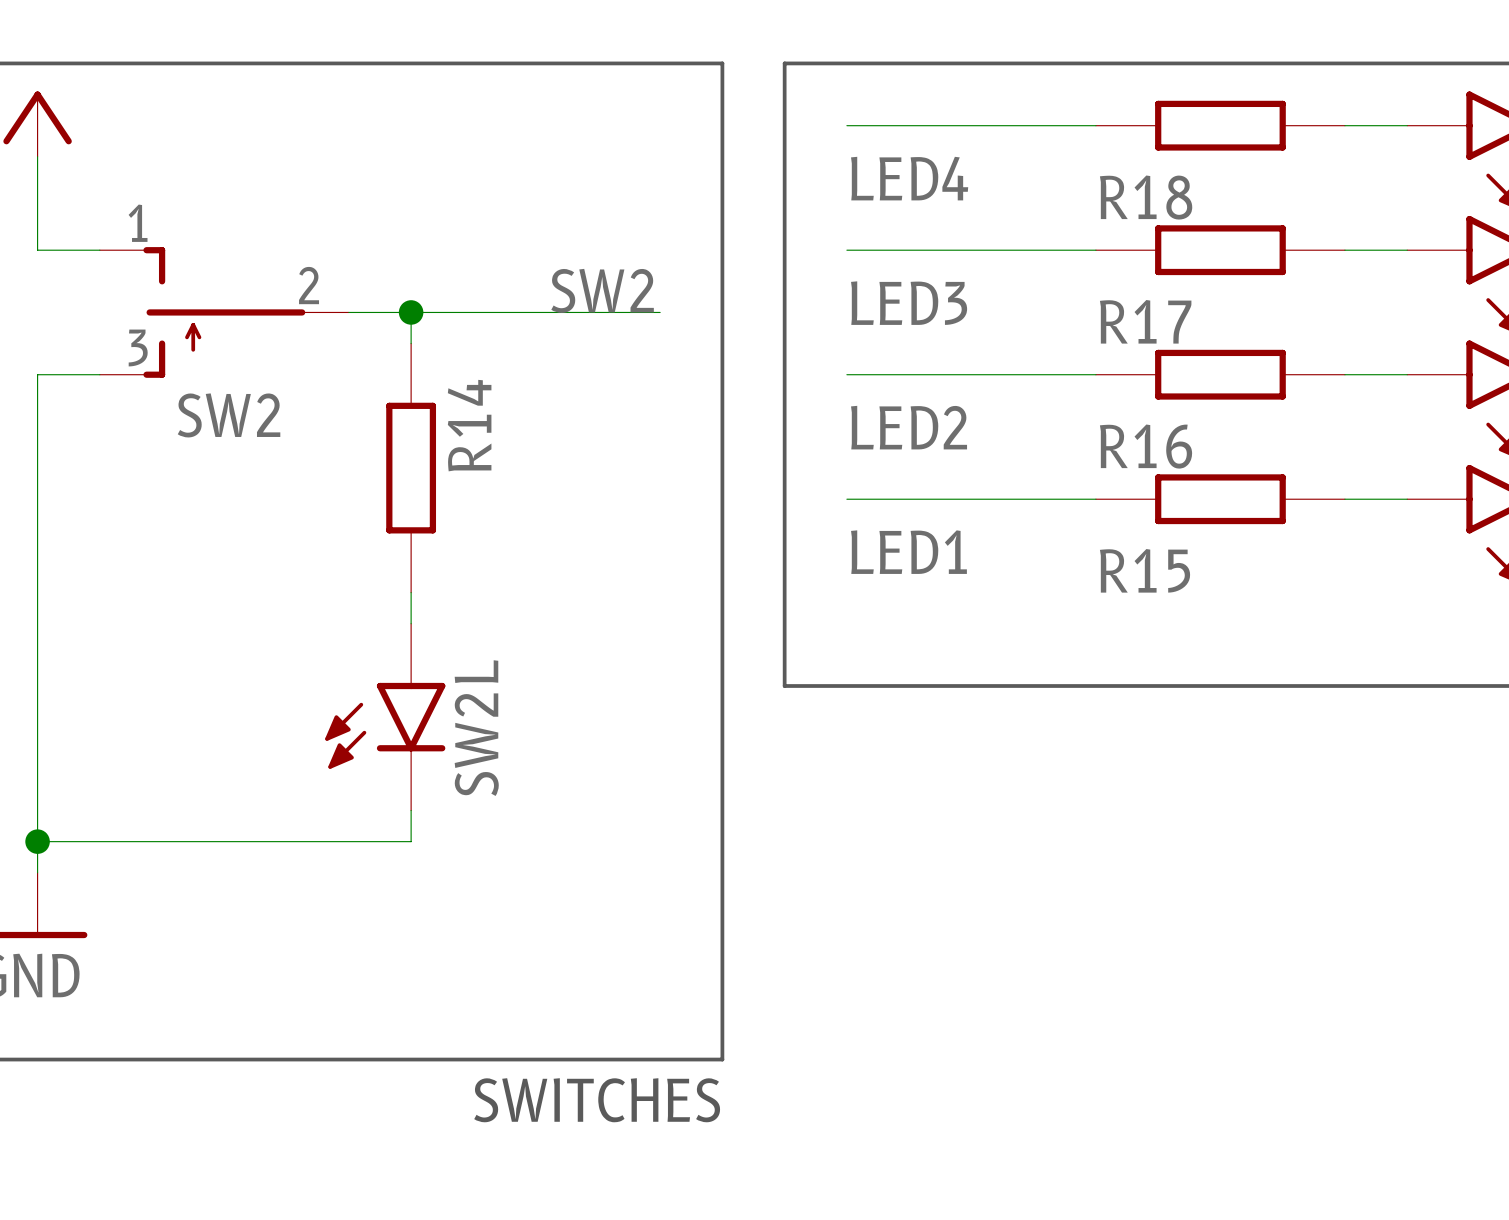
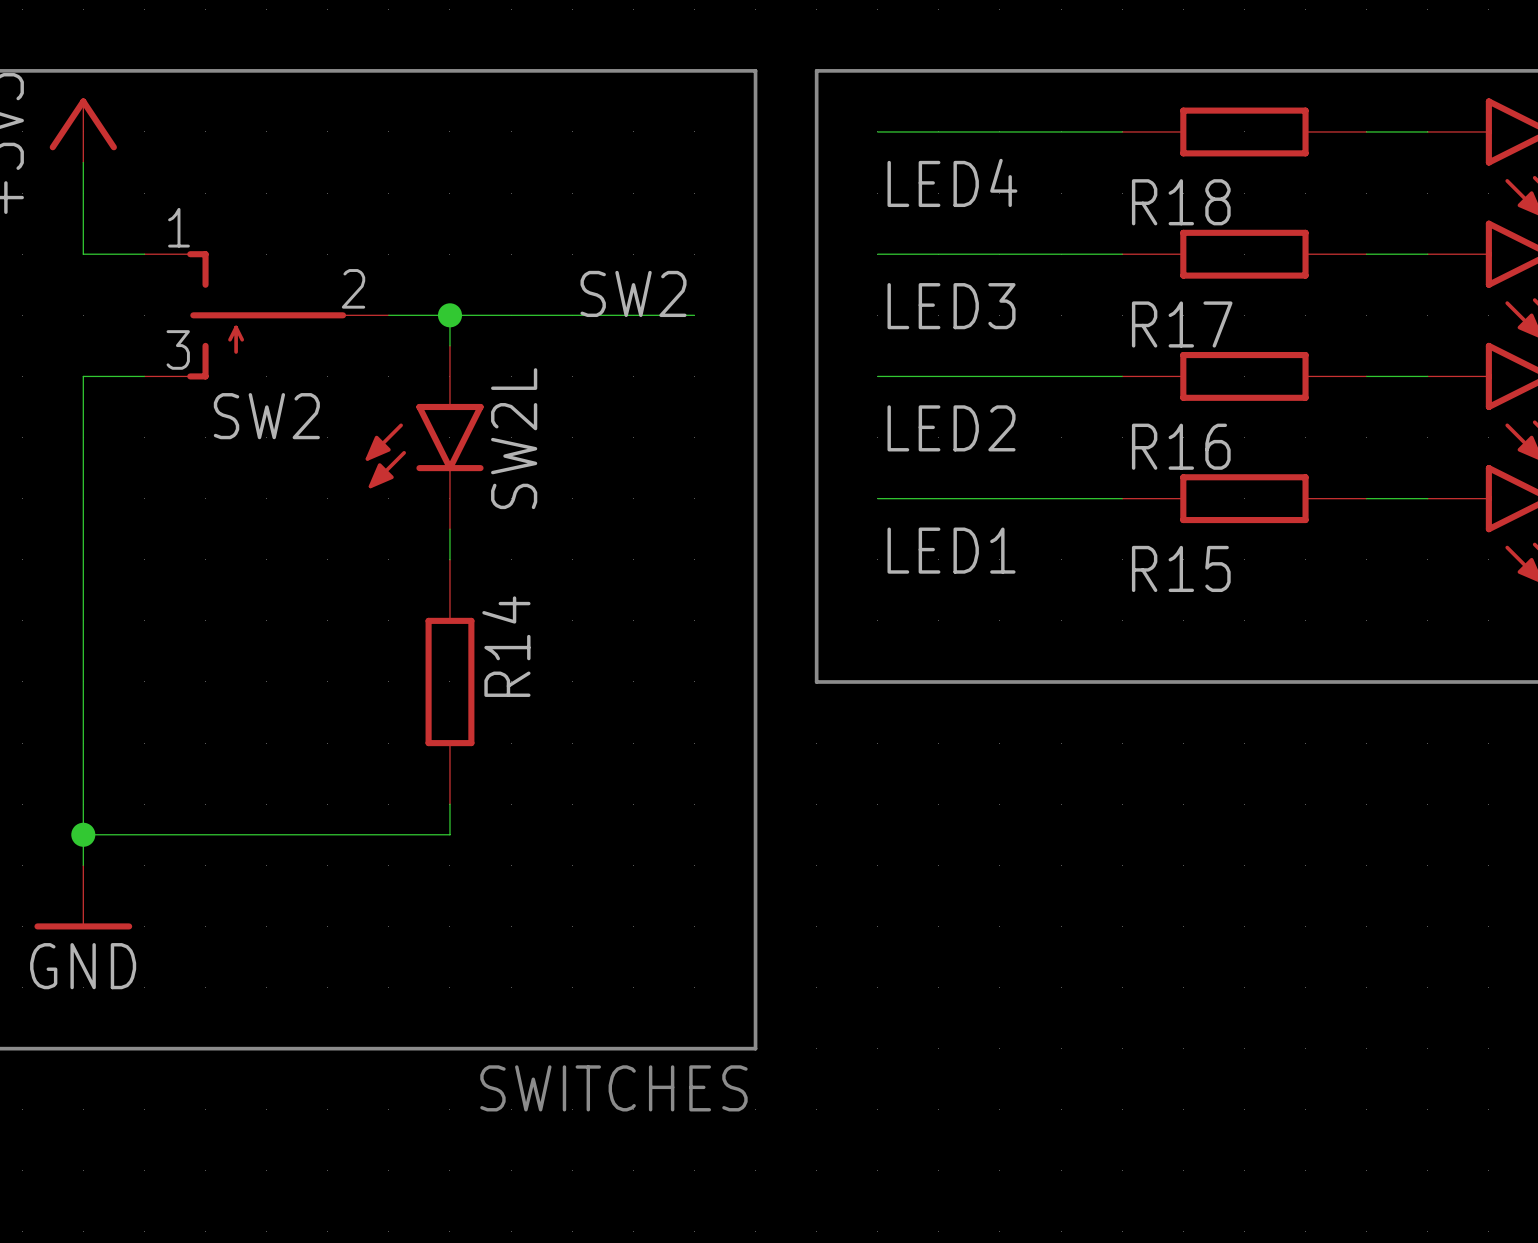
R14 position: (411, 468) -> (449, 681)
SW2L position: (385, 717) -> (424, 437)

